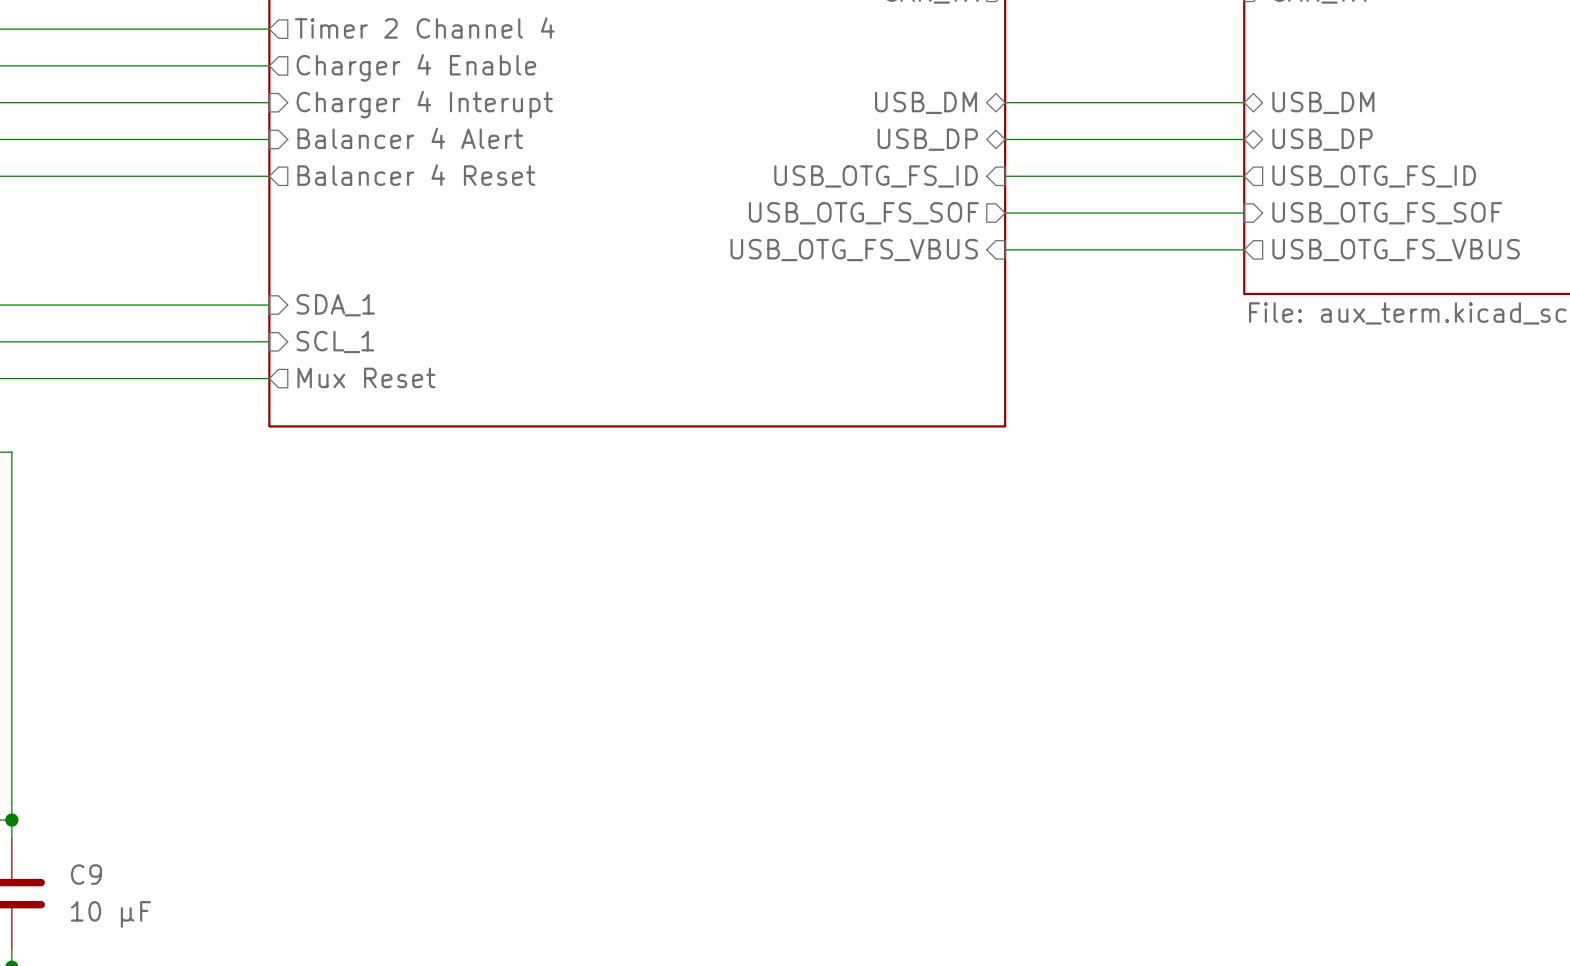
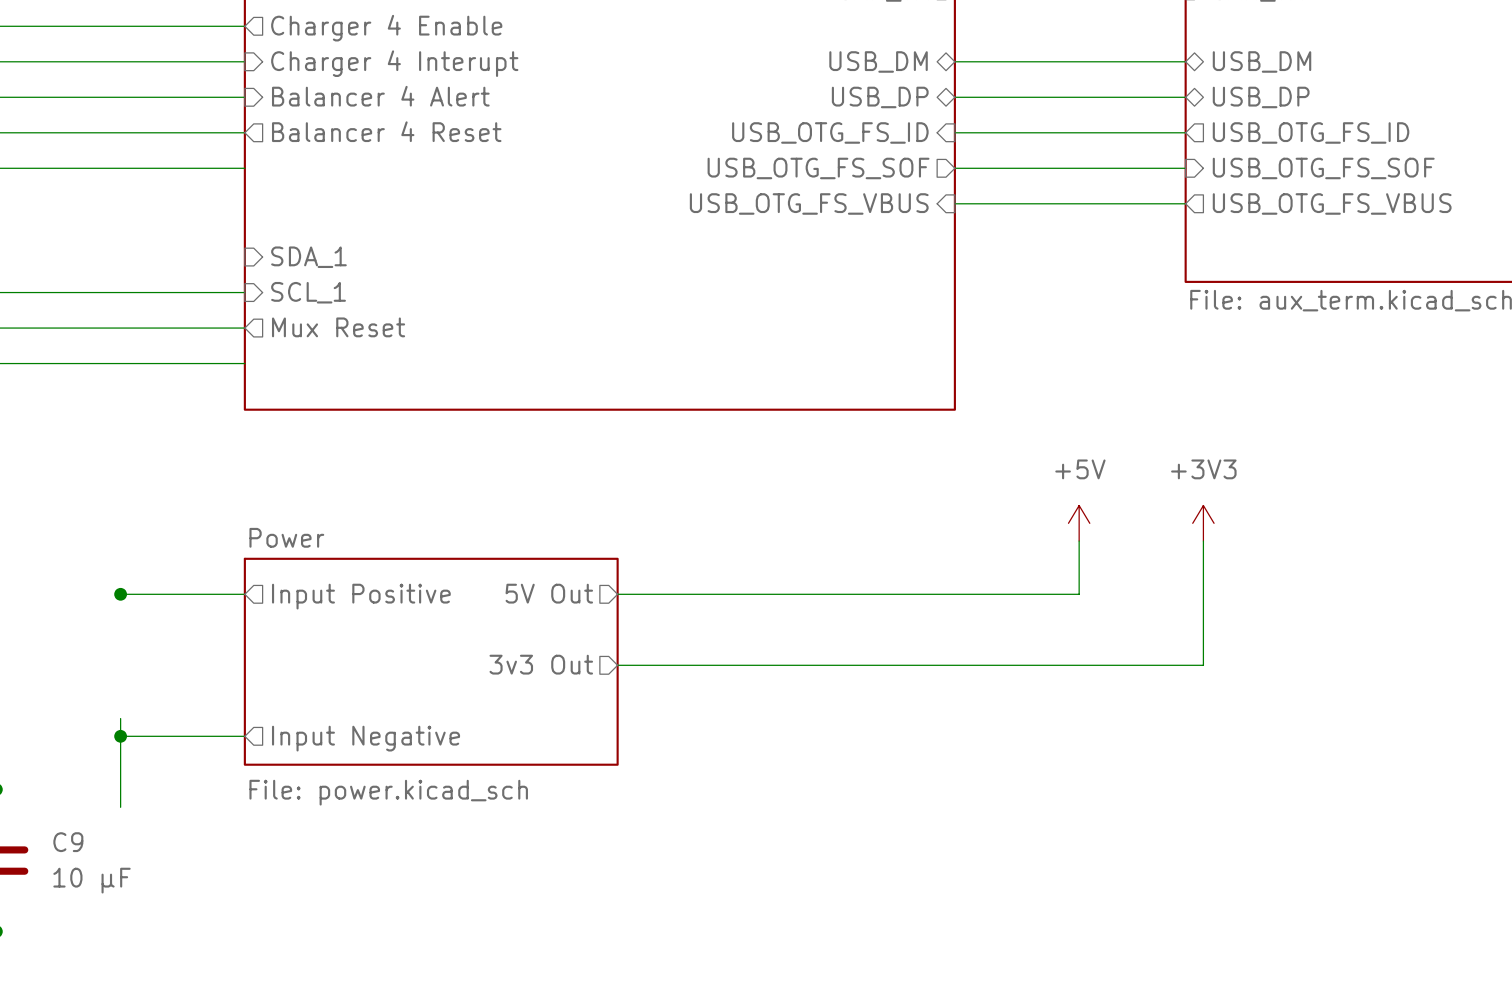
sheet pin: Timer 2 Channel 4 (424, 27) -> Charger 4 Enable (386, 28)
sheet pin: none -> USB_DM (878, 61)
sheet pin: none -> USB_DM (1262, 61)
sheet pin shape: output (416, 67) -> input (394, 63)
sheet pin: Charger 4 Enable (416, 67) -> Charger 4 Interupt (394, 63)
sheet pin: USB_DM (926, 102) -> USB_DP (880, 97)
sheet pin: USB_DM (1323, 102) -> USB_DP (1261, 97)
sheet pin: Charger 4 Interupt (424, 104) -> Balancer 4 Alert (380, 96)
sheet pin shape: input (410, 138) -> output (386, 131)
sheet pin: Balancer 4 Alert (410, 138) -> Balancer 4 Reset (386, 131)
sheet pin shape: bidirectional (927, 139) -> input (830, 132)
sheet pin: USB_DP (927, 139) -> USB_OTG_FS_ID (830, 132)
sheet pin shape: bidirectional (1322, 139) -> output (1311, 132)
sheet pin: USB_DP (1322, 139) -> USB_OTG_FS_ID (1311, 132)
sheet pin: Balancer 4 Reset (416, 175) -> none
sheet pin shape: input (876, 176) -> output (818, 168)
sheet pin: USB_OTG_FS_ID (876, 176) -> USB_OTG_FS_SOF (818, 168)
sheet pin shape: output (1374, 176) -> input (1323, 168)
sheet pin: USB_OTG_FS_ID (1374, 176) -> USB_OTG_FS_SOF (1323, 168)
sheet pin shape: output (863, 213) -> input (809, 203)
sheet pin: USB_OTG_FS_SOF (863, 213) -> USB_OTG_FS_VBUS (809, 203)
sheet pin shape: input (1387, 213) -> output (1332, 203)
sheet pin: USB_OTG_FS_SOF (1387, 213) -> USB_OTG_FS_VBUS (1332, 203)
wire: (1005, 249) (1244, 249) -> (954, 61) (1185, 61)
sheet pin: USB_OTG_FS_VBUS (854, 250) -> none
sheet pin: USB_OTG_FS_VBUS (1396, 250) -> none
sheet pin: none -> SDA_1 (308, 257)
sheet pin: SDA_1 (335, 305) -> SCL_1 (308, 292)
sheet pin shape: input (335, 342) -> output (338, 327)
sheet pin: SCL_1 (335, 342) -> Mux Reset (338, 327)
sheet pin: Mux Reset (366, 377) -> none
power symbol: none -> +5V (1079, 523)
power symbol: none -> +3V3 (1203, 523)
wire: none -> (1079, 541) (1079, 594) (617, 594)
wire: none -> (1203, 541) (1203, 665) (617, 665)
wire: none -> (120, 594) (244, 594)
junction: none -> (120, 594)
sheet pin: none -> 5V Out (549, 593)
sheet pin: none -> Input Positive (361, 596)
sheet Power: none -> File: power.kicad_sch (431, 661)
sheet pin: none -> 3v3 Out (541, 664)
wire: none -> (120, 718) (120, 807)
wire: none -> (120, 736) (244, 736)
junction: none -> (120, 736)
sheet pin: none -> Input Negative (366, 738)

